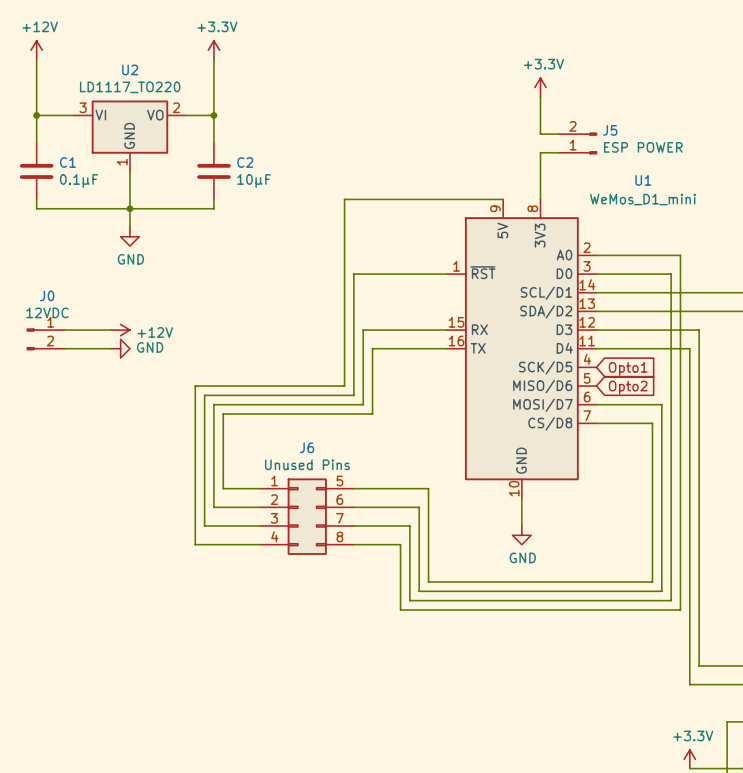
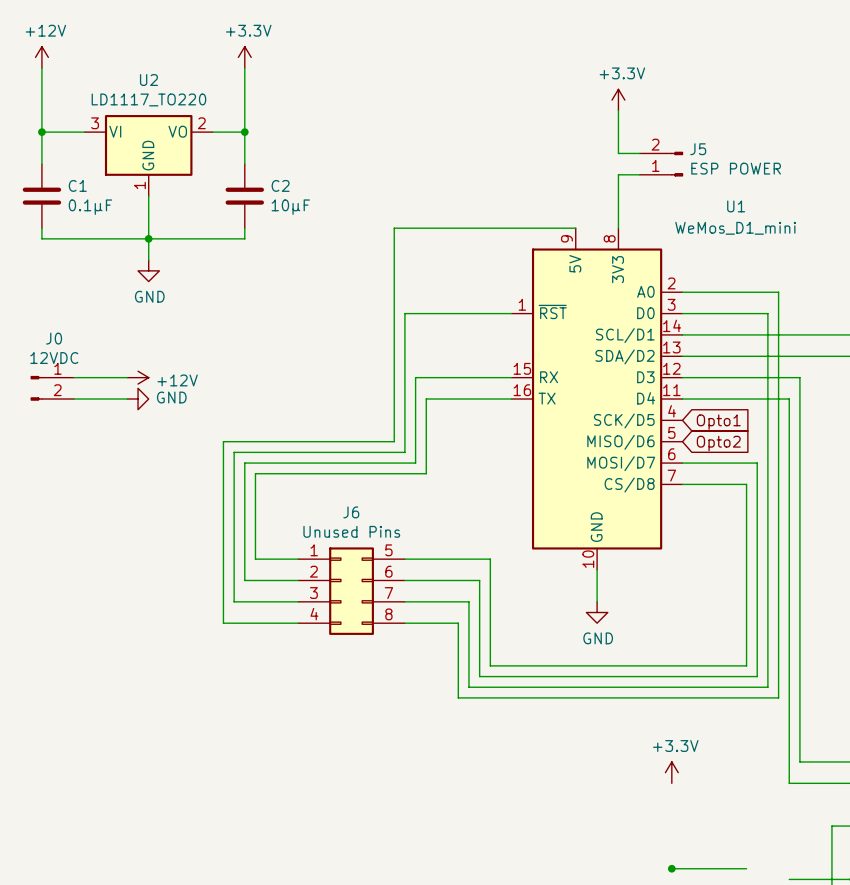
wire: none -> (671, 868) (746, 868)
junction: none -> (671, 868)
power symbol position: +3.3V (689, 759) -> +3.3V (671, 772)

